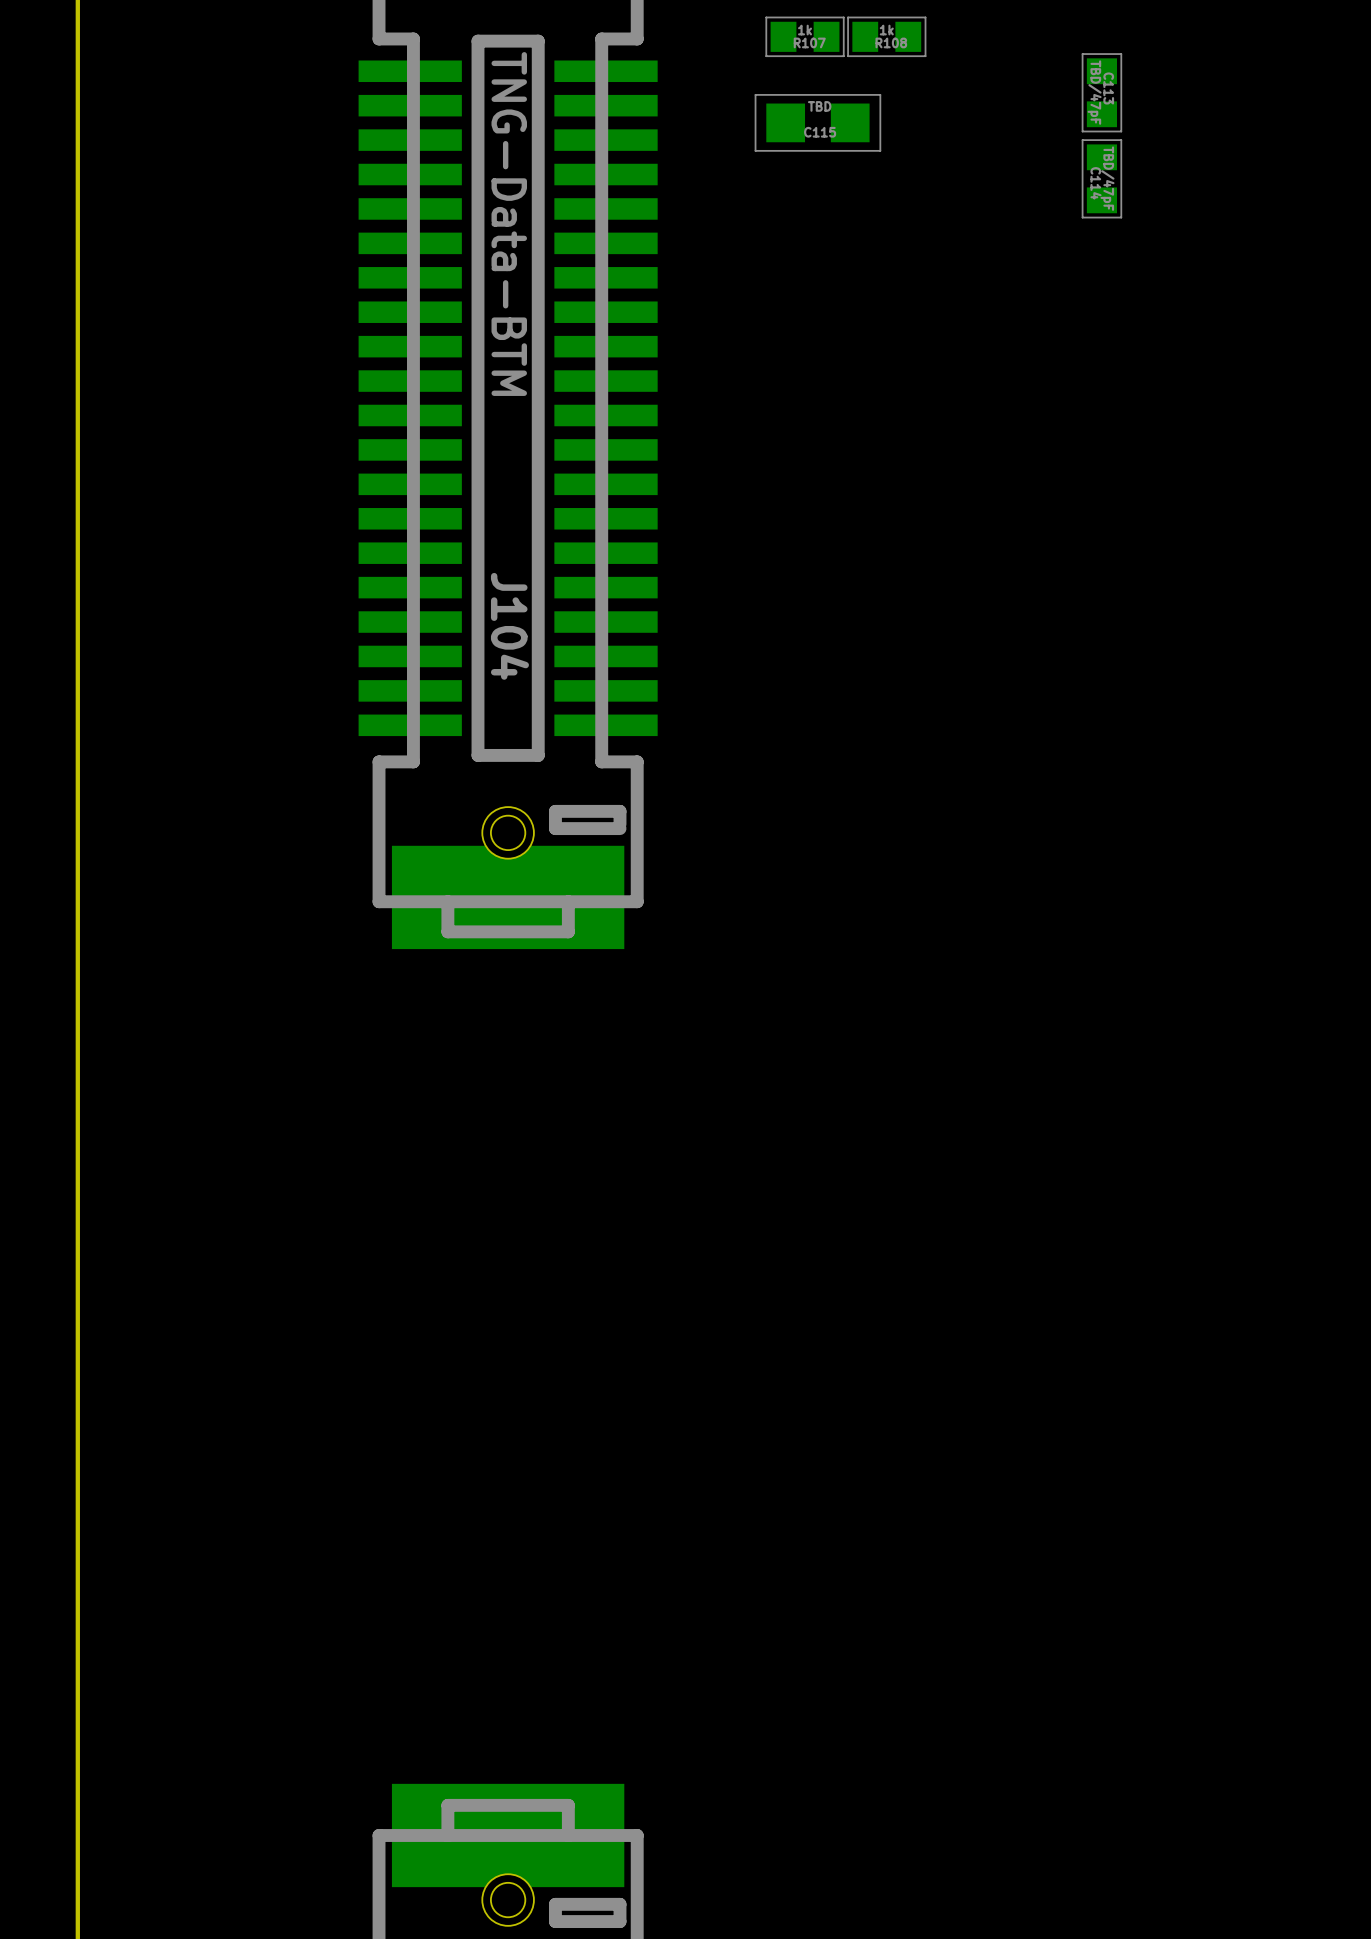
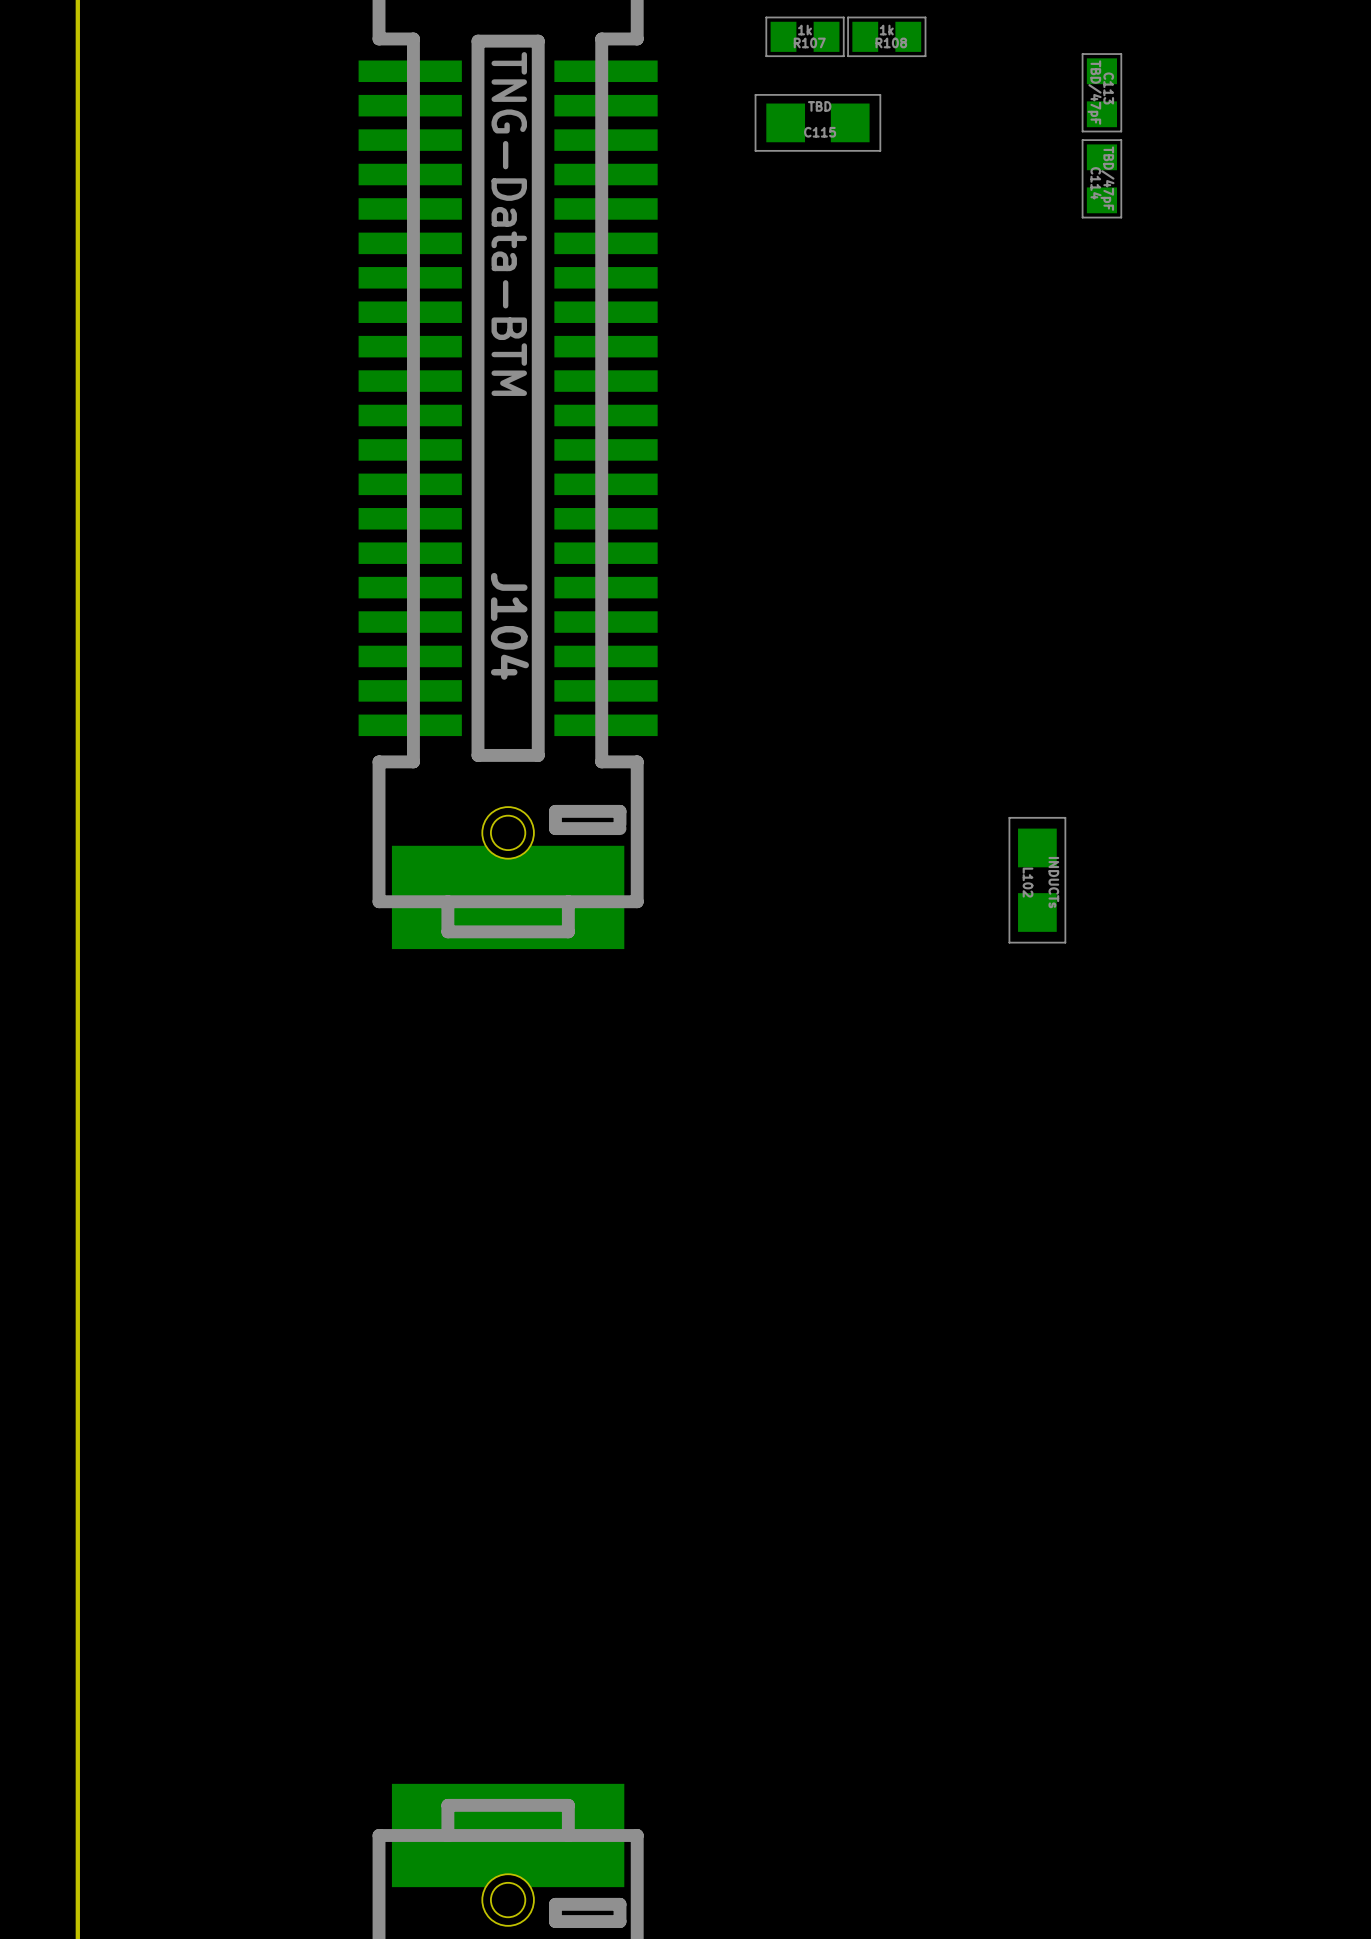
L102: none -> INDUCTs (1037, 880)

